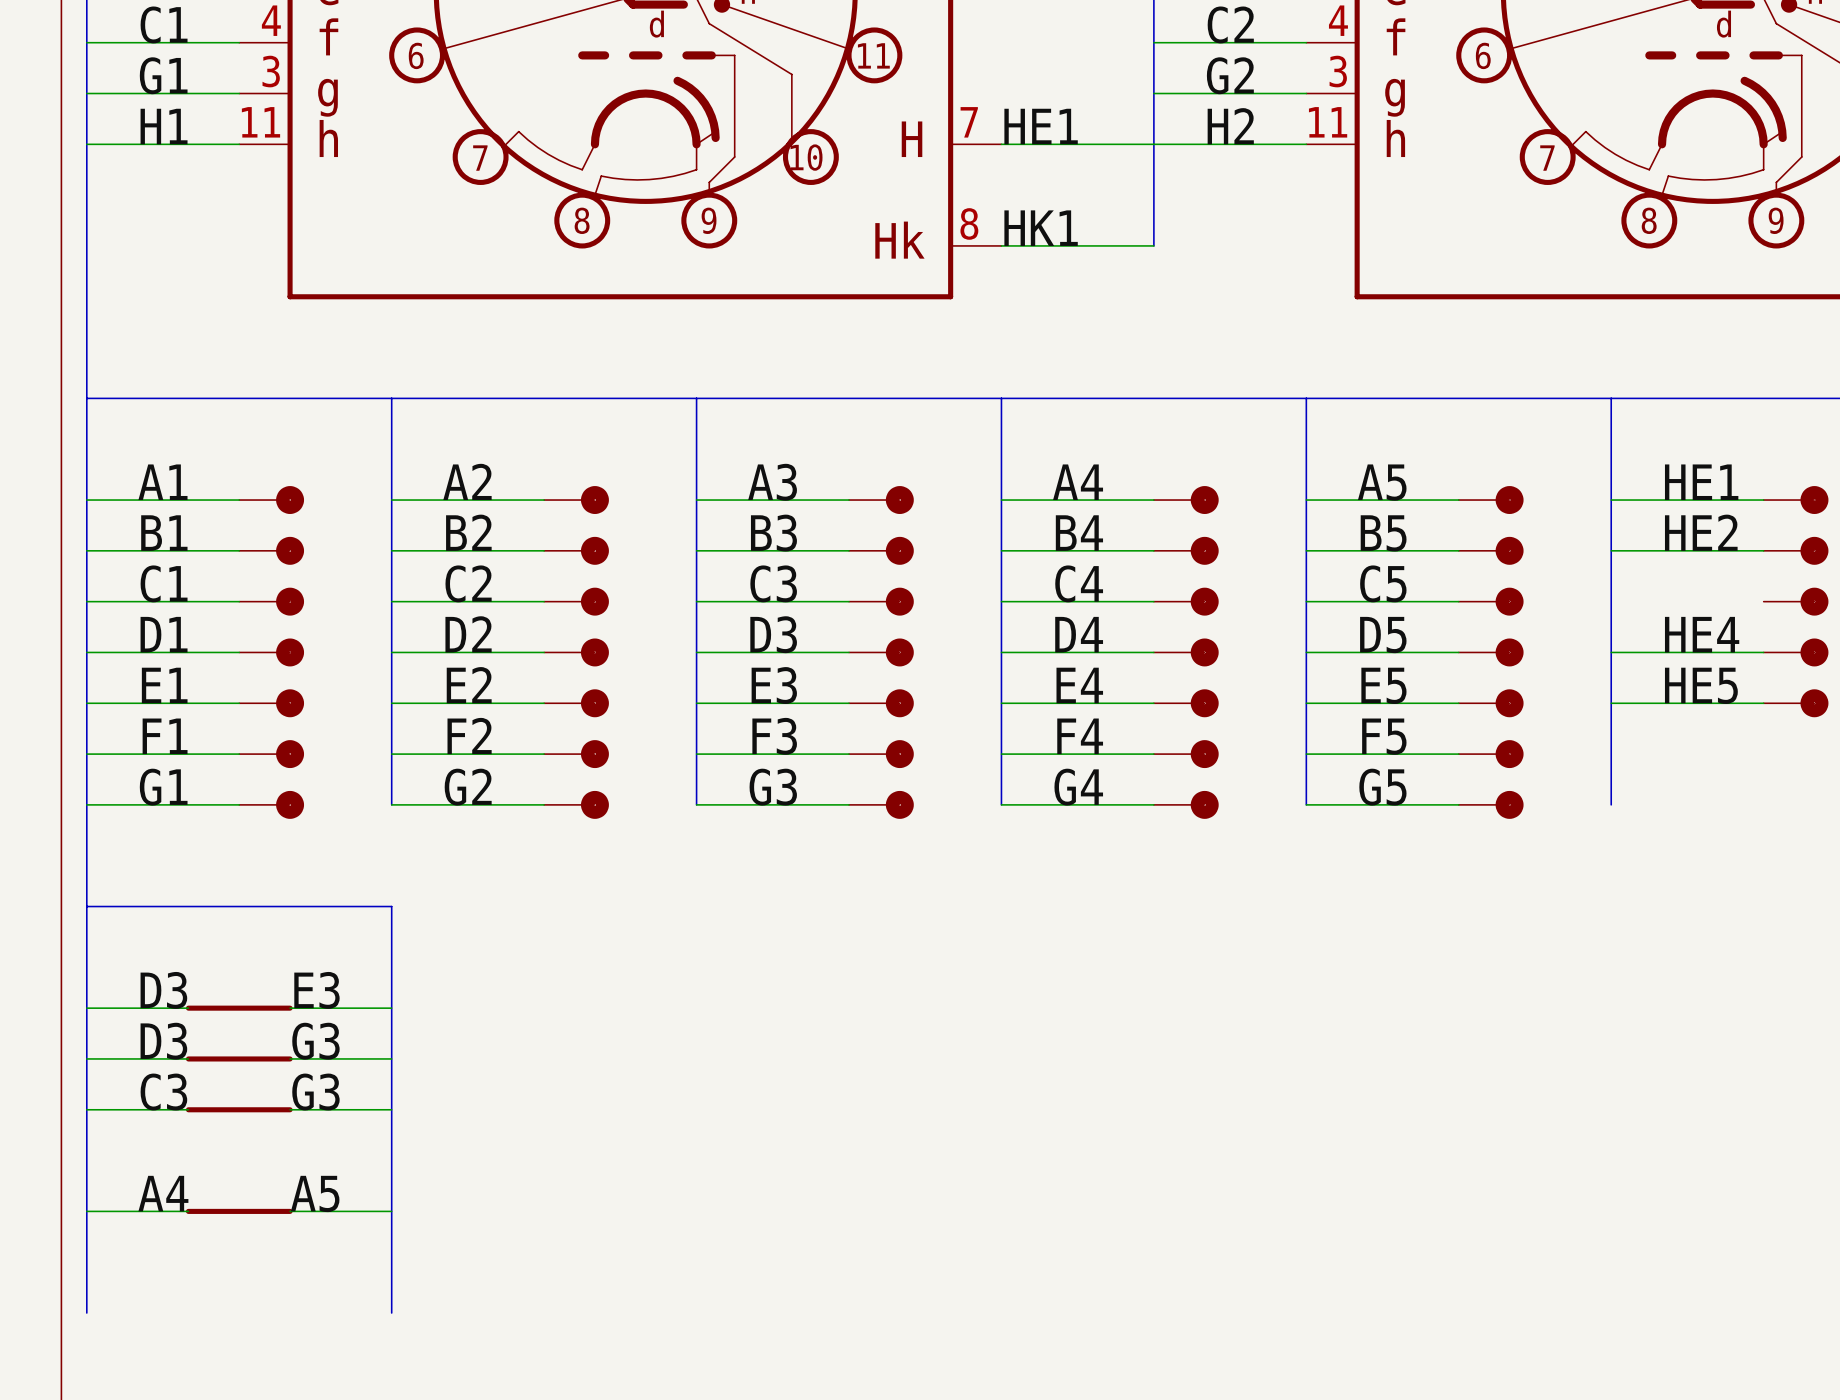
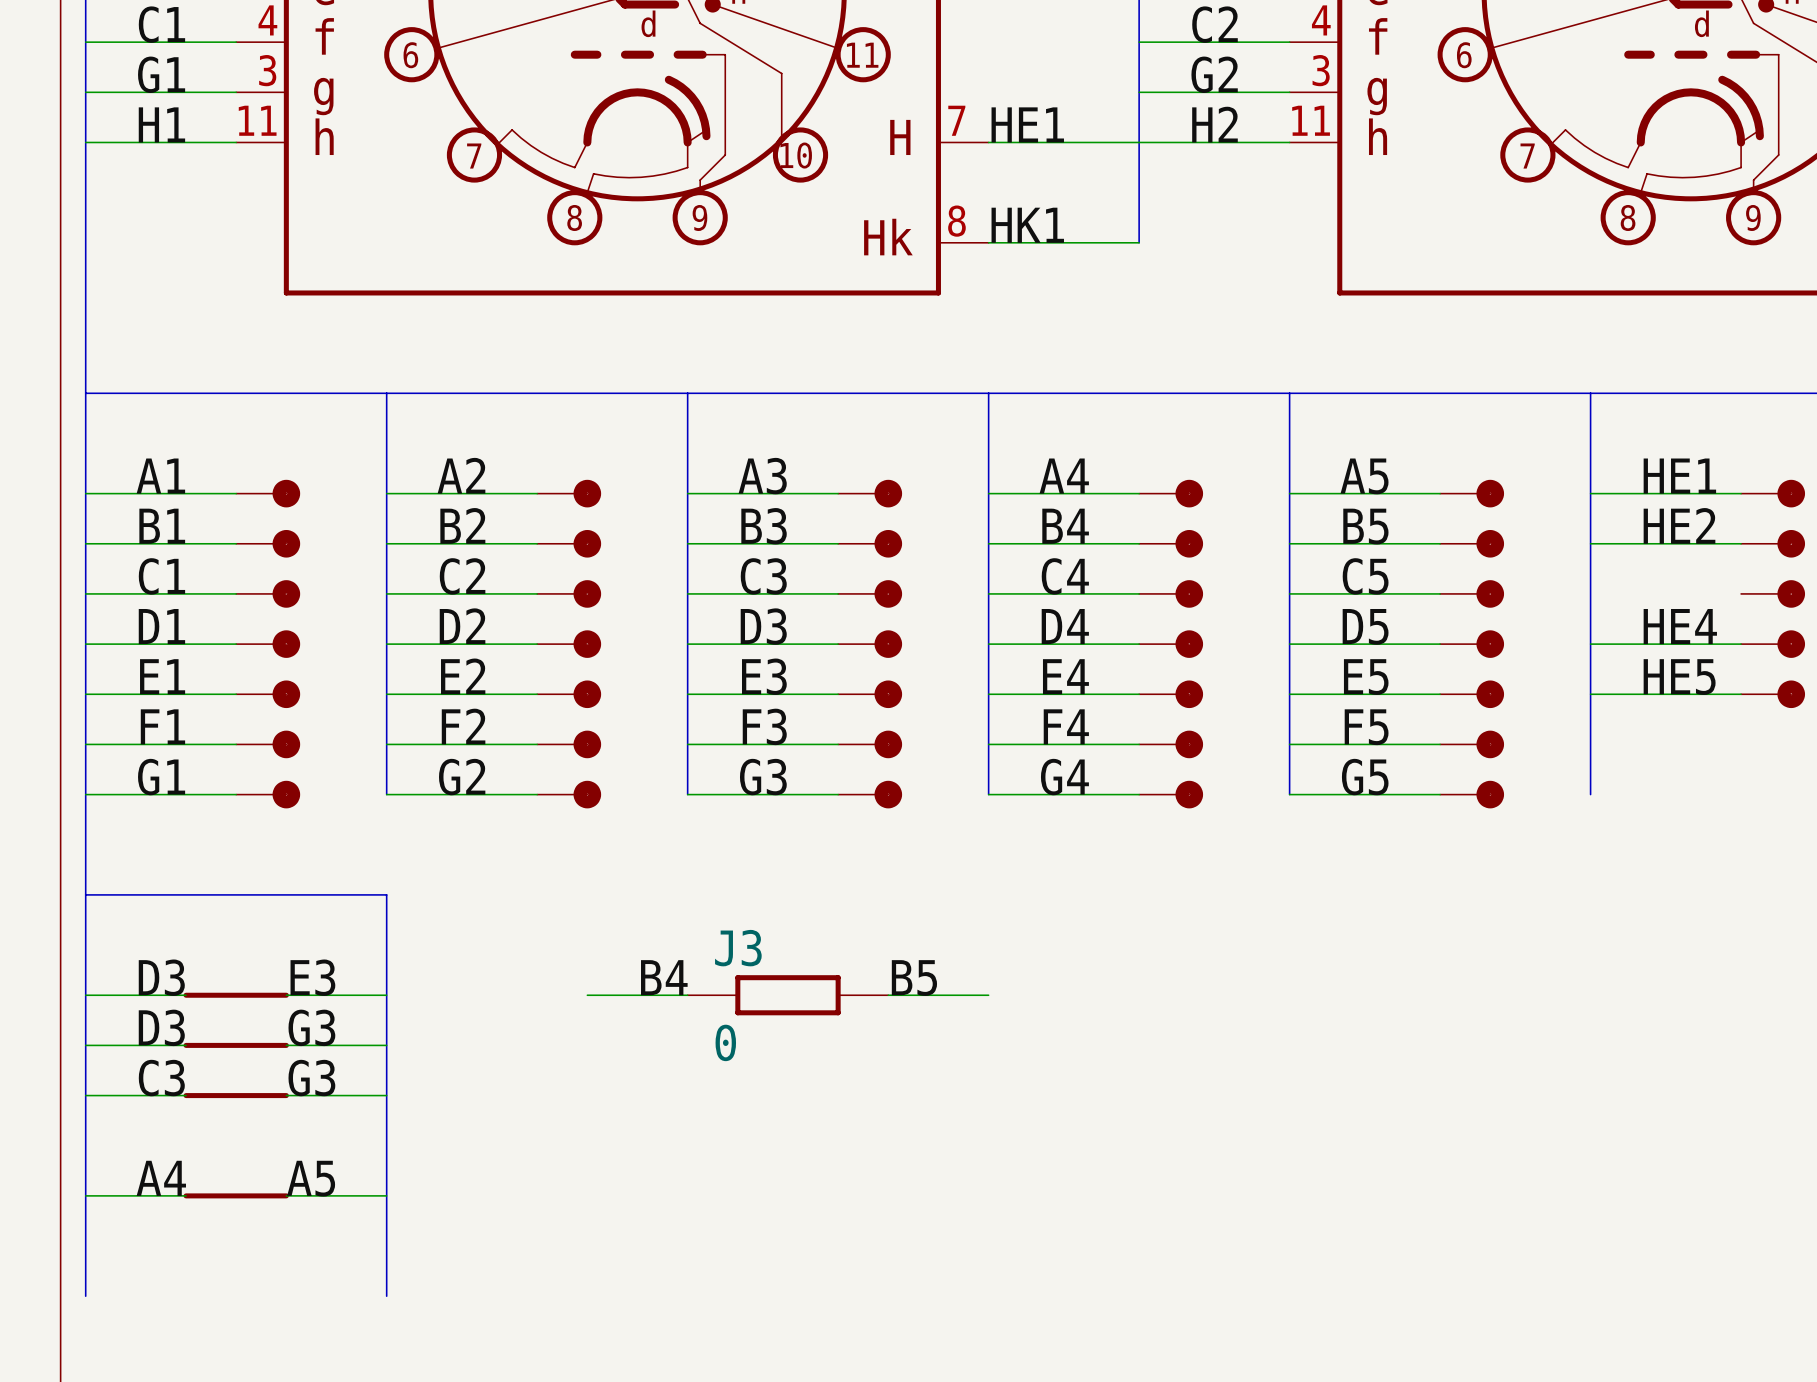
label: none -> B4 (664, 977)
label: none -> B5 (914, 978)
wire: none -> (587, 995) (687, 995)
J3: none -> 0 (787, 995)
wire: none -> (888, 995) (988, 995)

